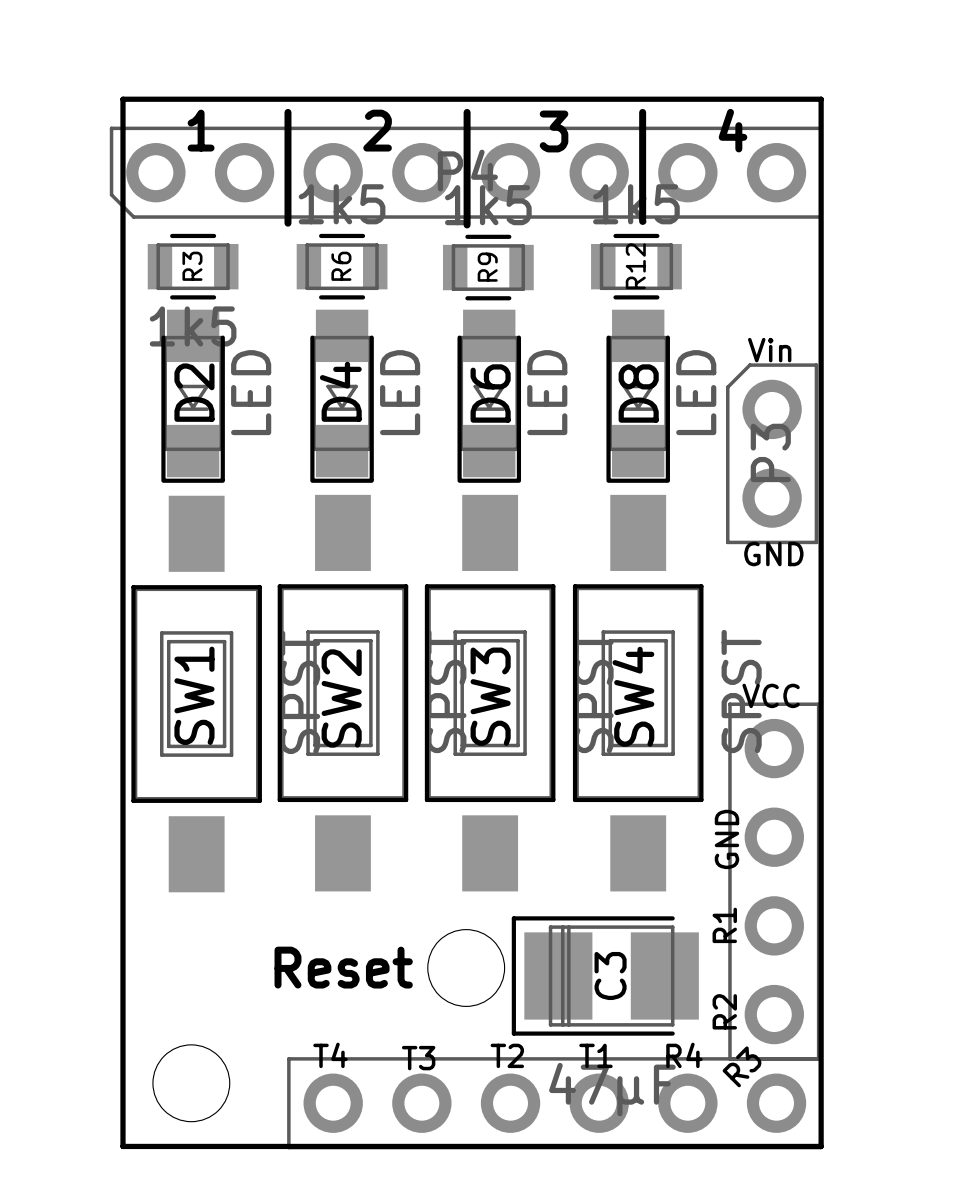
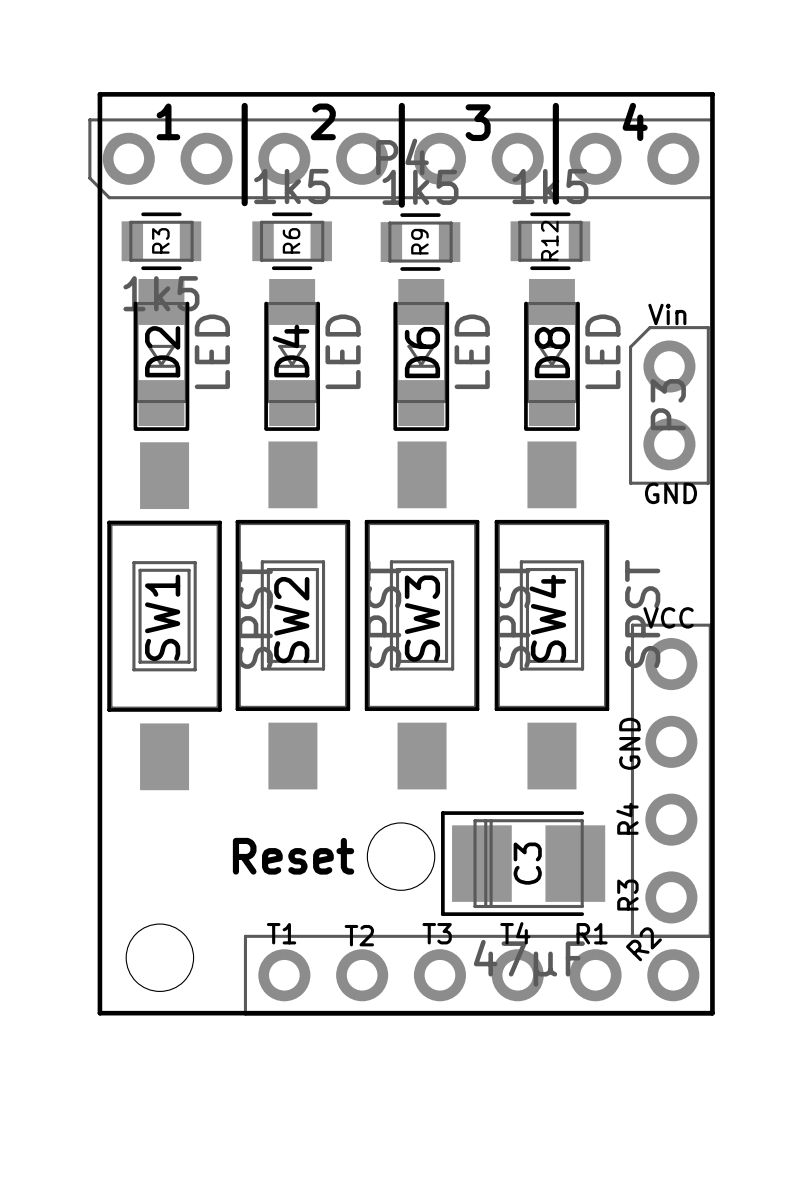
text: R1 (724, 925) -> R4 (627, 818)
text: R2 (724, 1011) -> R3 (627, 895)
text: T4 (330, 1055) -> T1 (281, 933)
text: T2 (507, 1055) -> T3 (437, 933)
text: T1 (595, 1055) -> T4 (515, 933)
text: R4 (684, 1055) -> R1 (592, 933)
text: T3 (418, 1058) -> T2 (359, 935)
text: R3 (742, 1066) -> R2 (643, 944)

